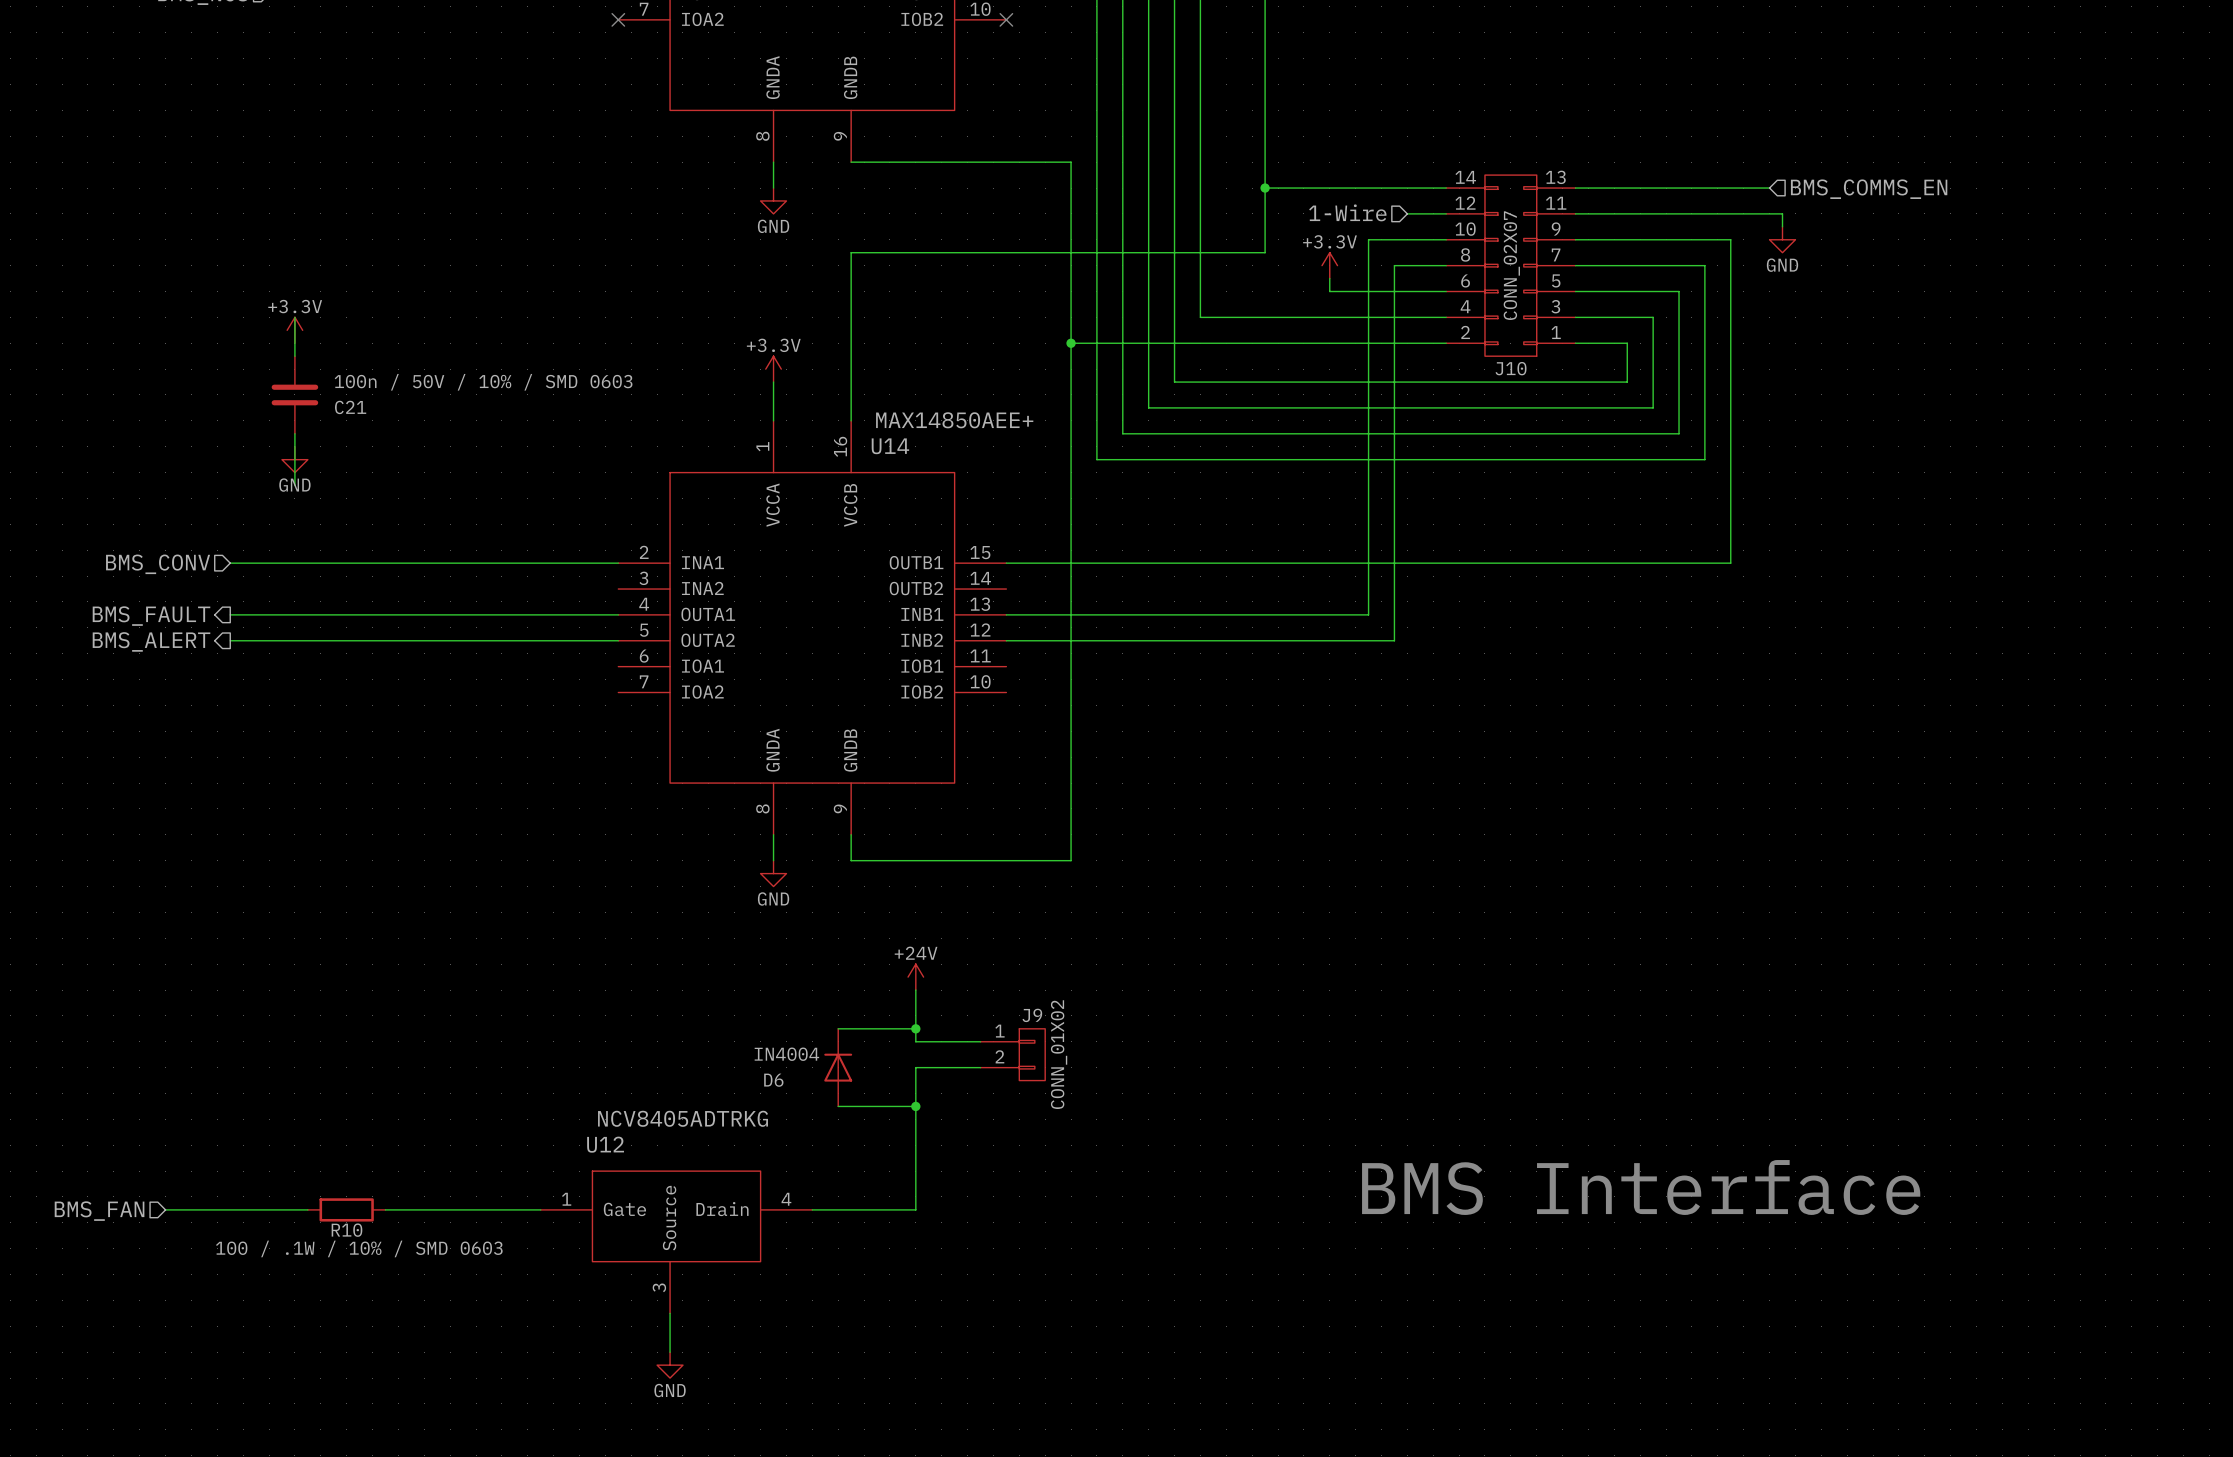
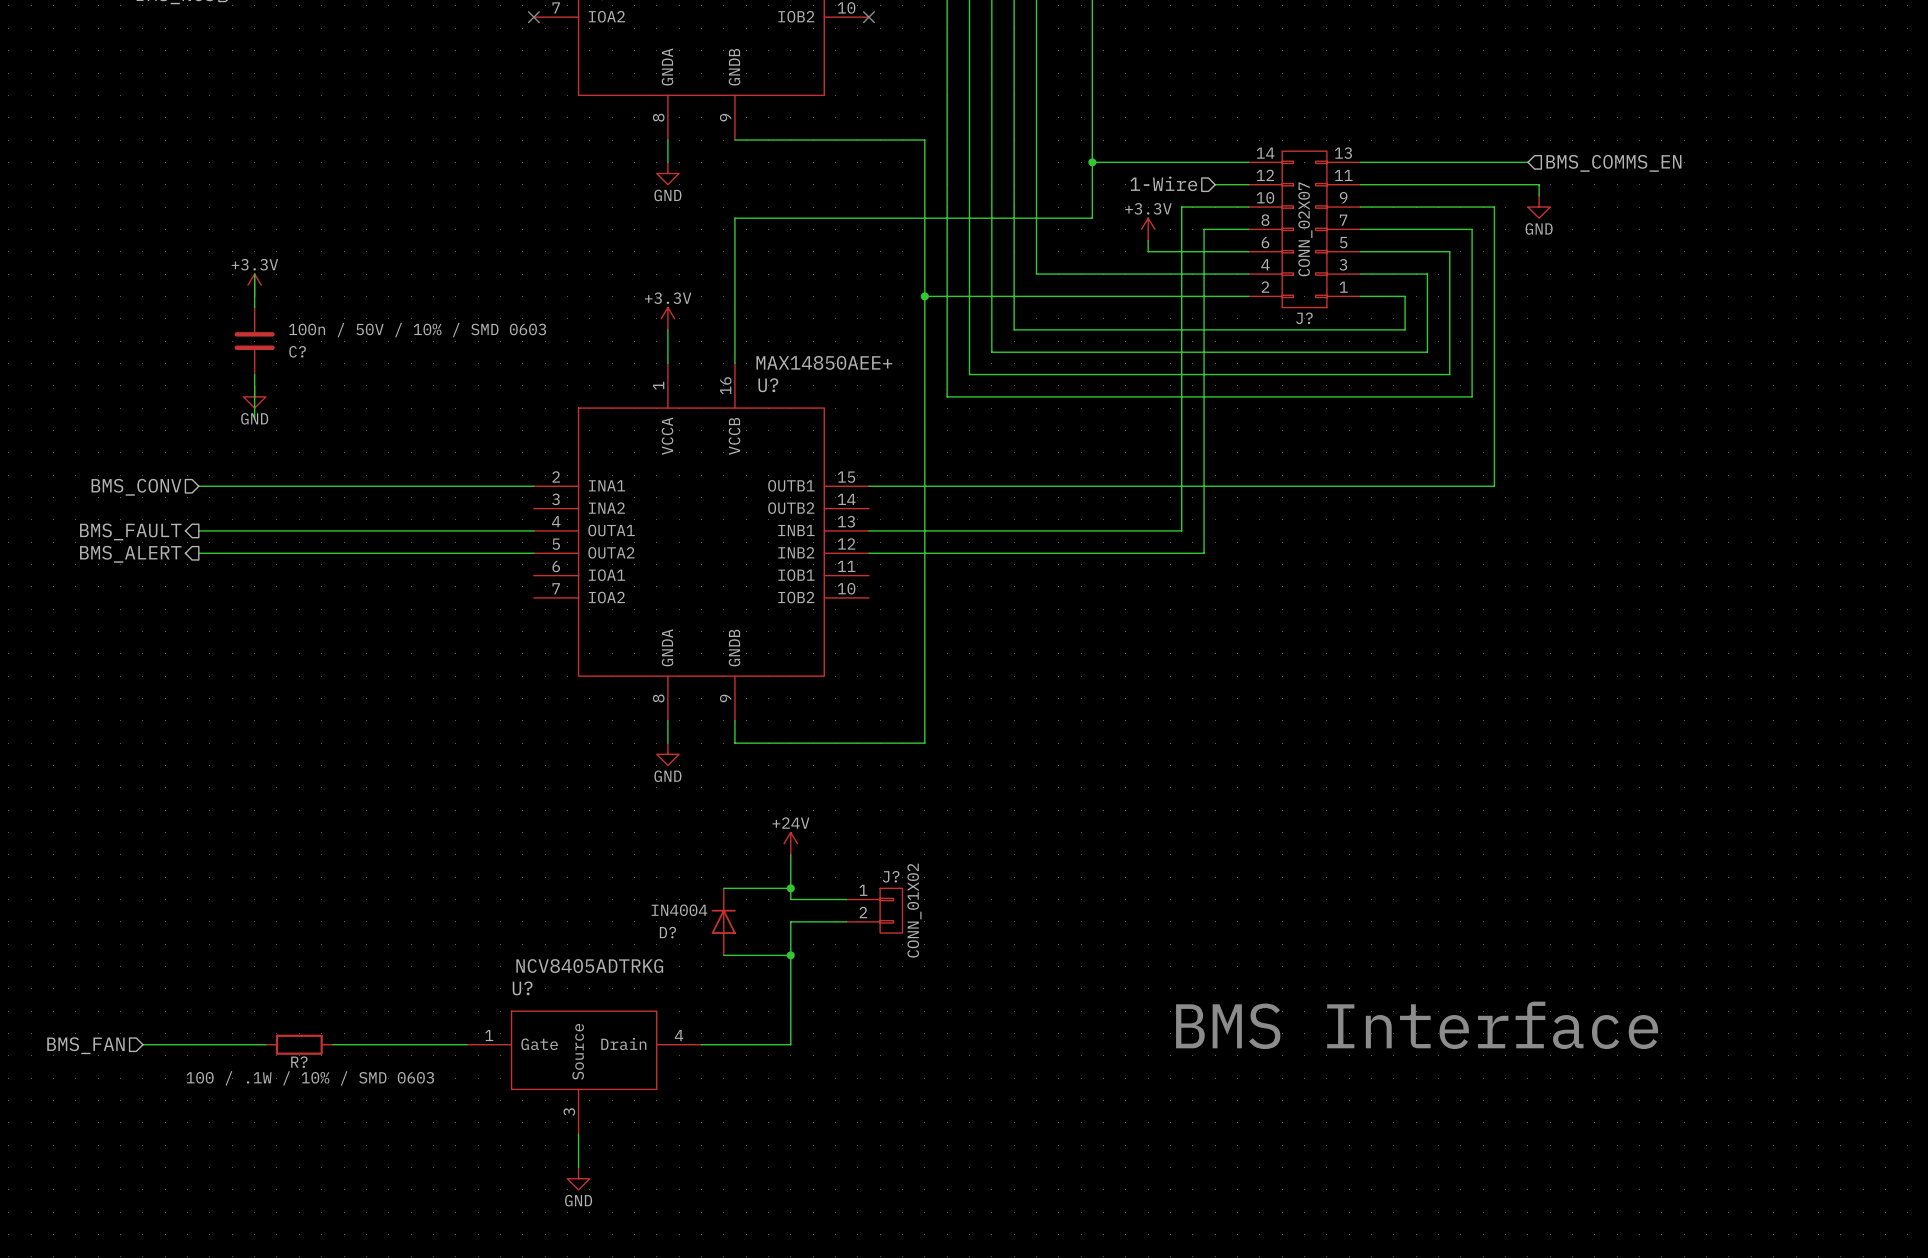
J10 name: J10 (1511, 368) -> J? (1304, 318)
C21 name: C21 (350, 407) -> C? (297, 351)
U14 name: U14 (890, 446) -> U? (768, 385)
J9 name: J9 (1032, 1015) -> J? (891, 876)
D6 name: D6 (773, 1080) -> D? (667, 932)
U12 name: U12 (605, 1144) -> U? (522, 988)
R10 name: R10 (346, 1230) -> R? (299, 1062)

